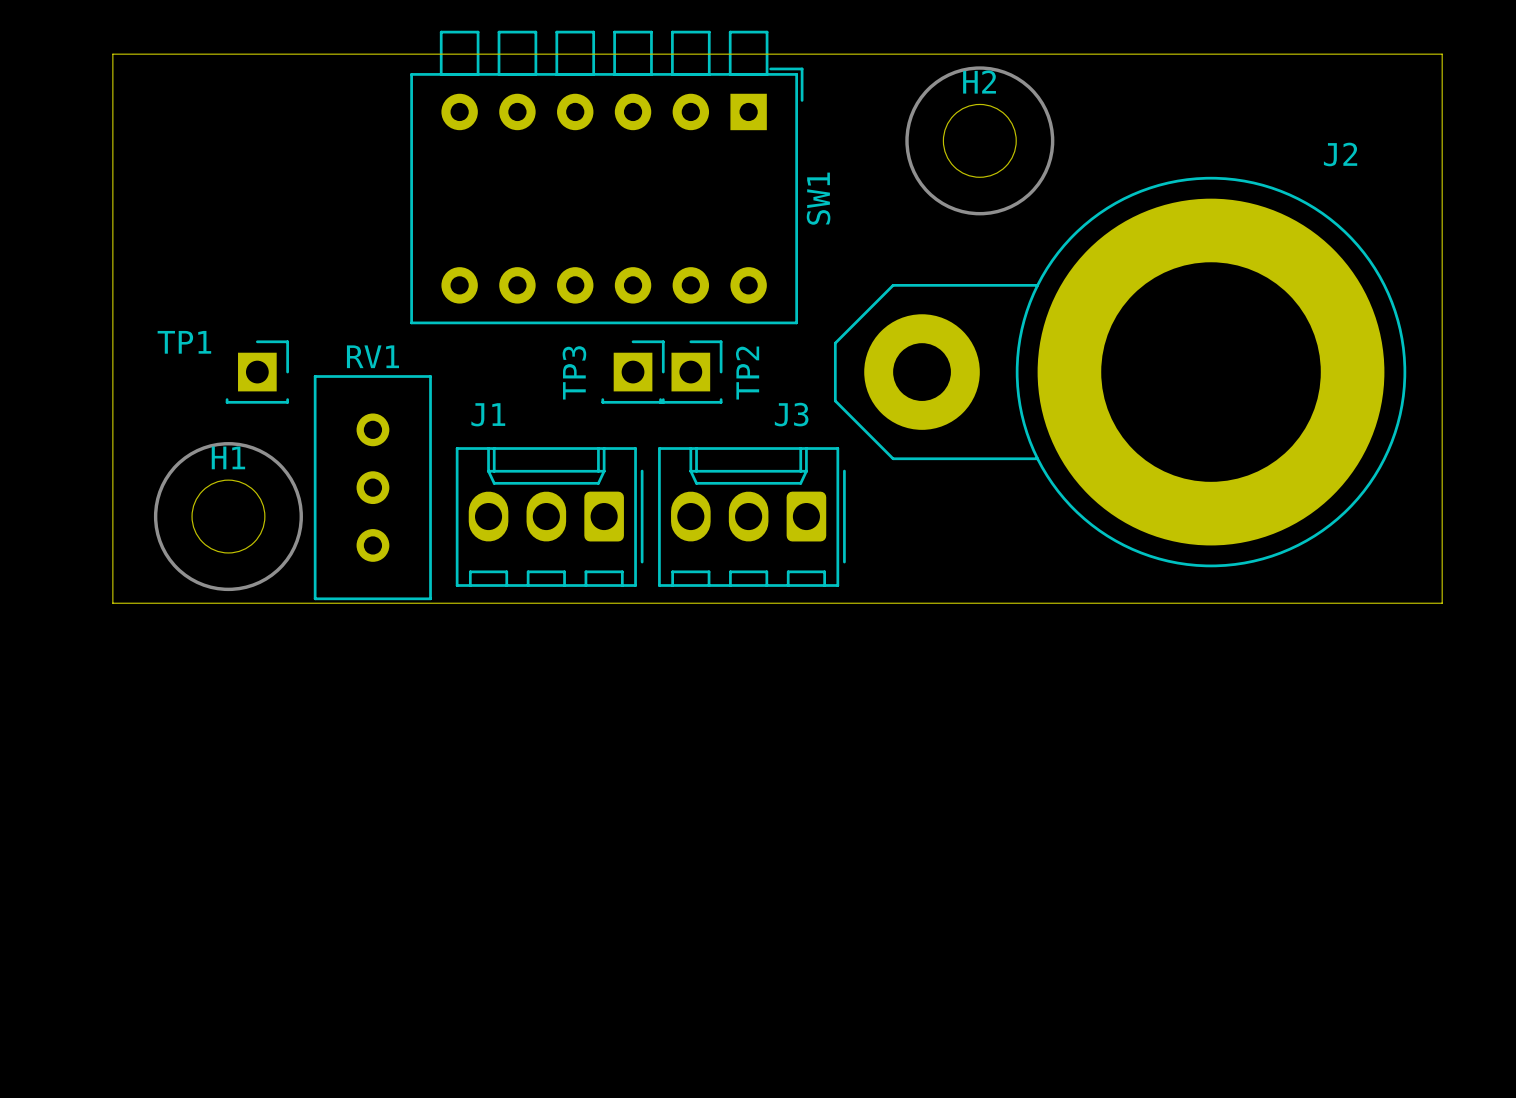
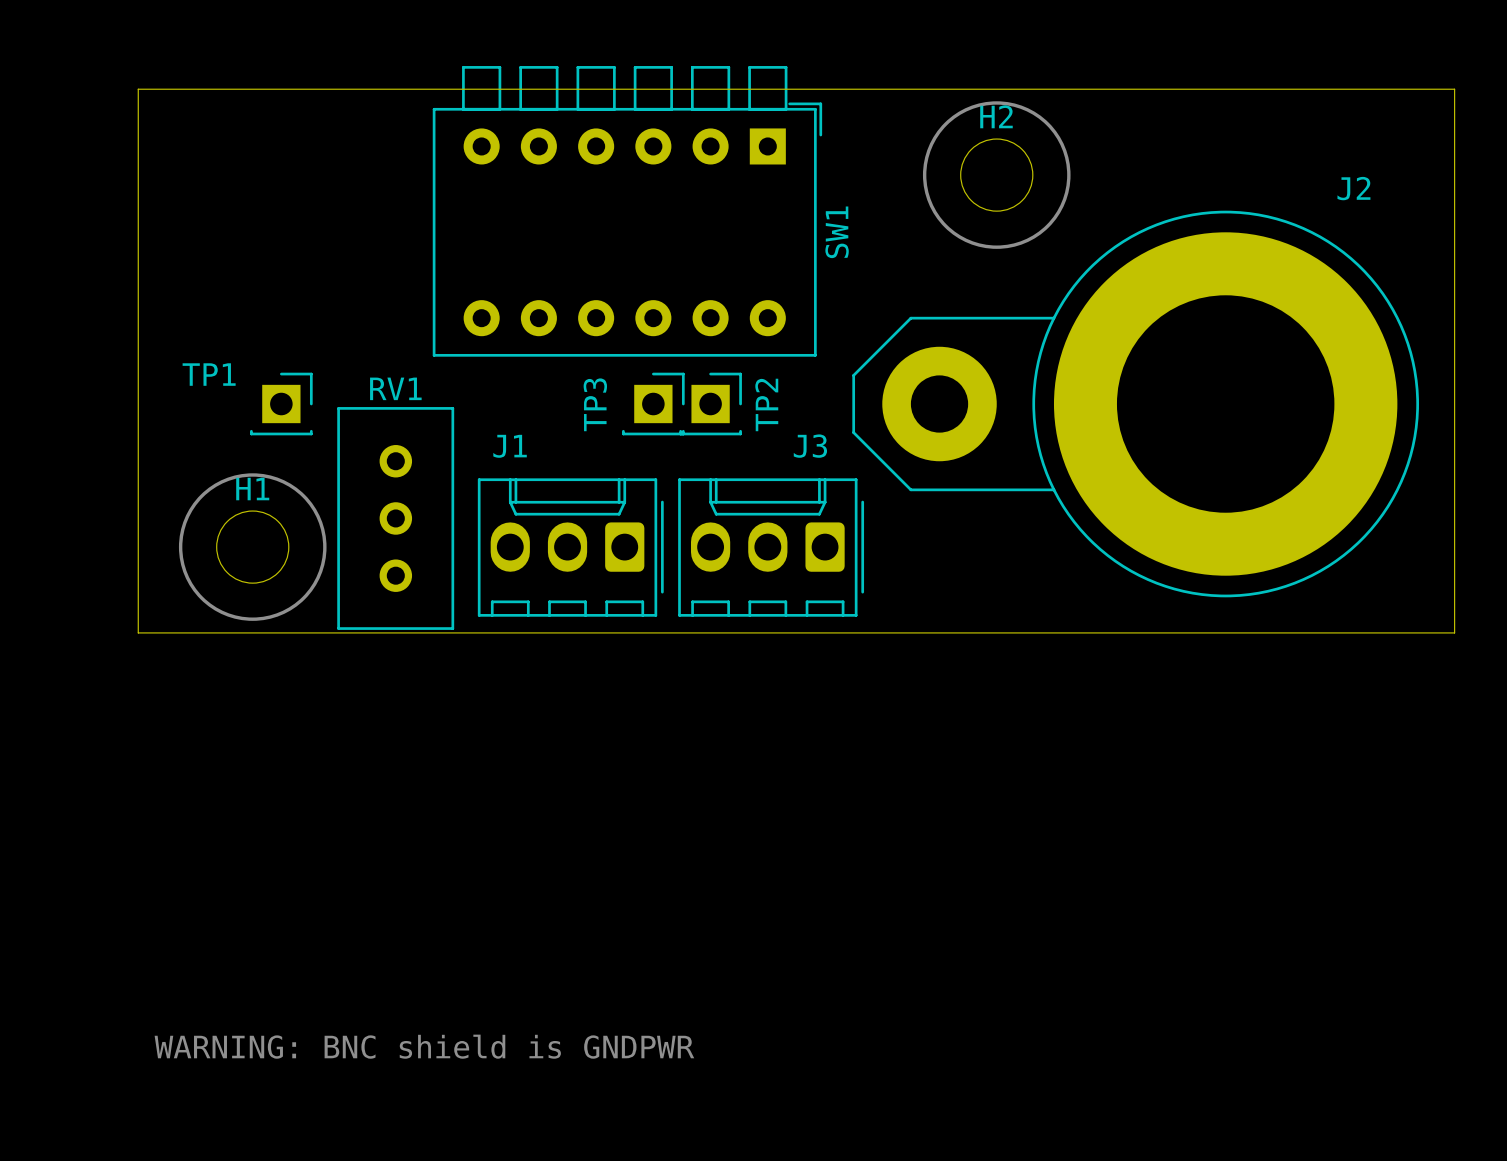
text: none -> WARNING: BNC shield is GNDPWR (424, 1046)

